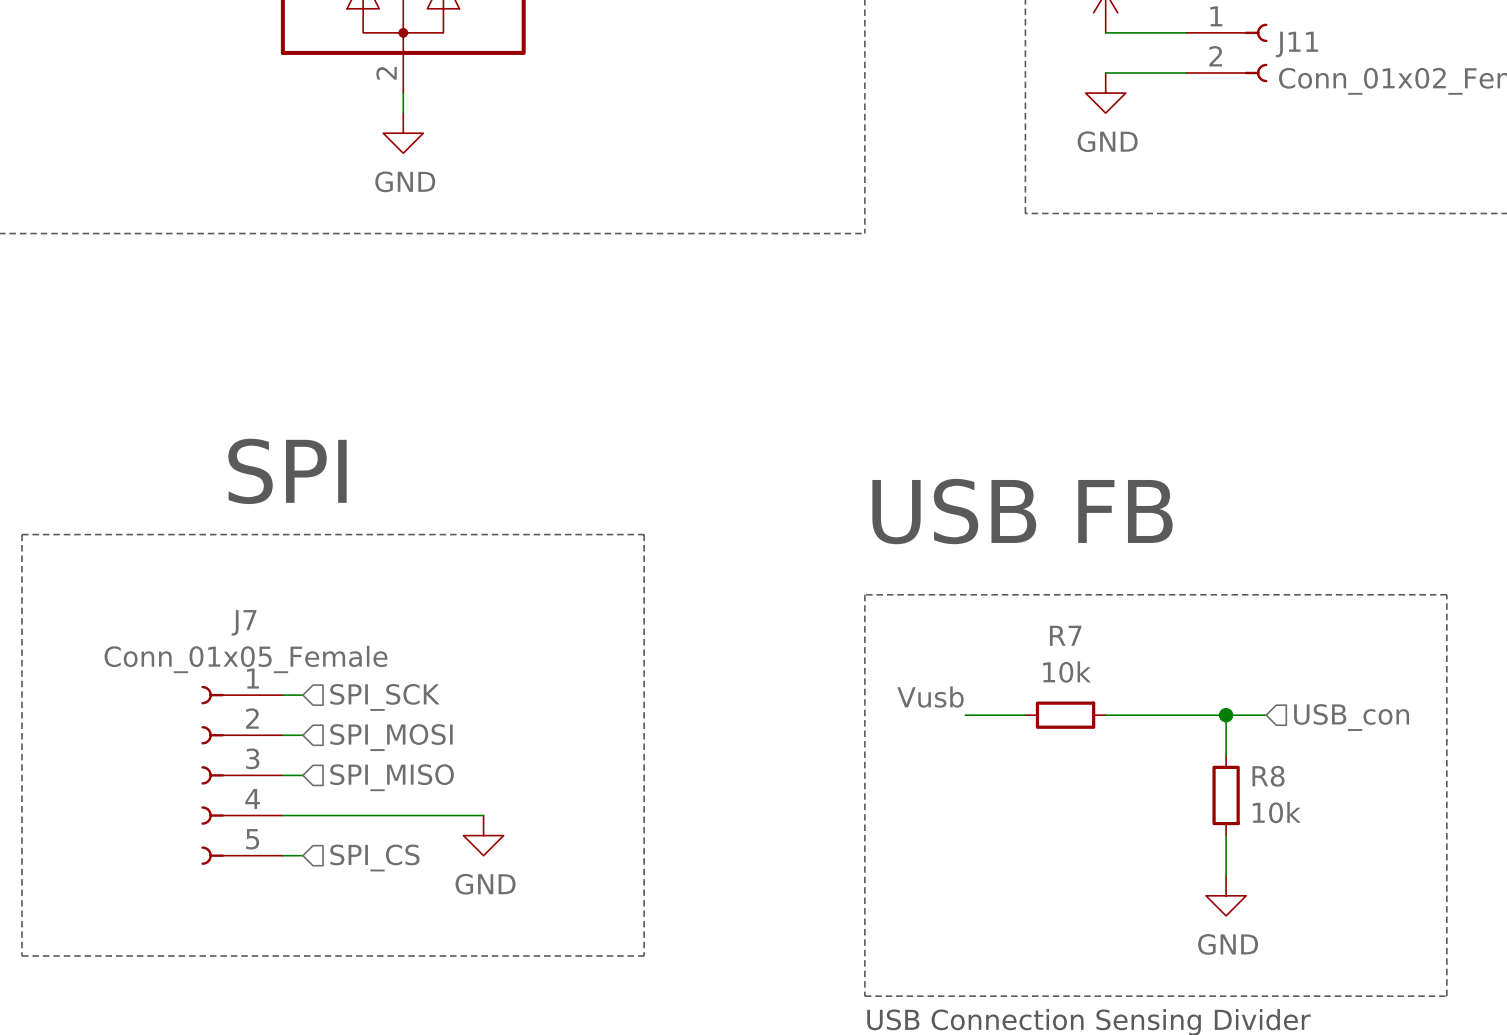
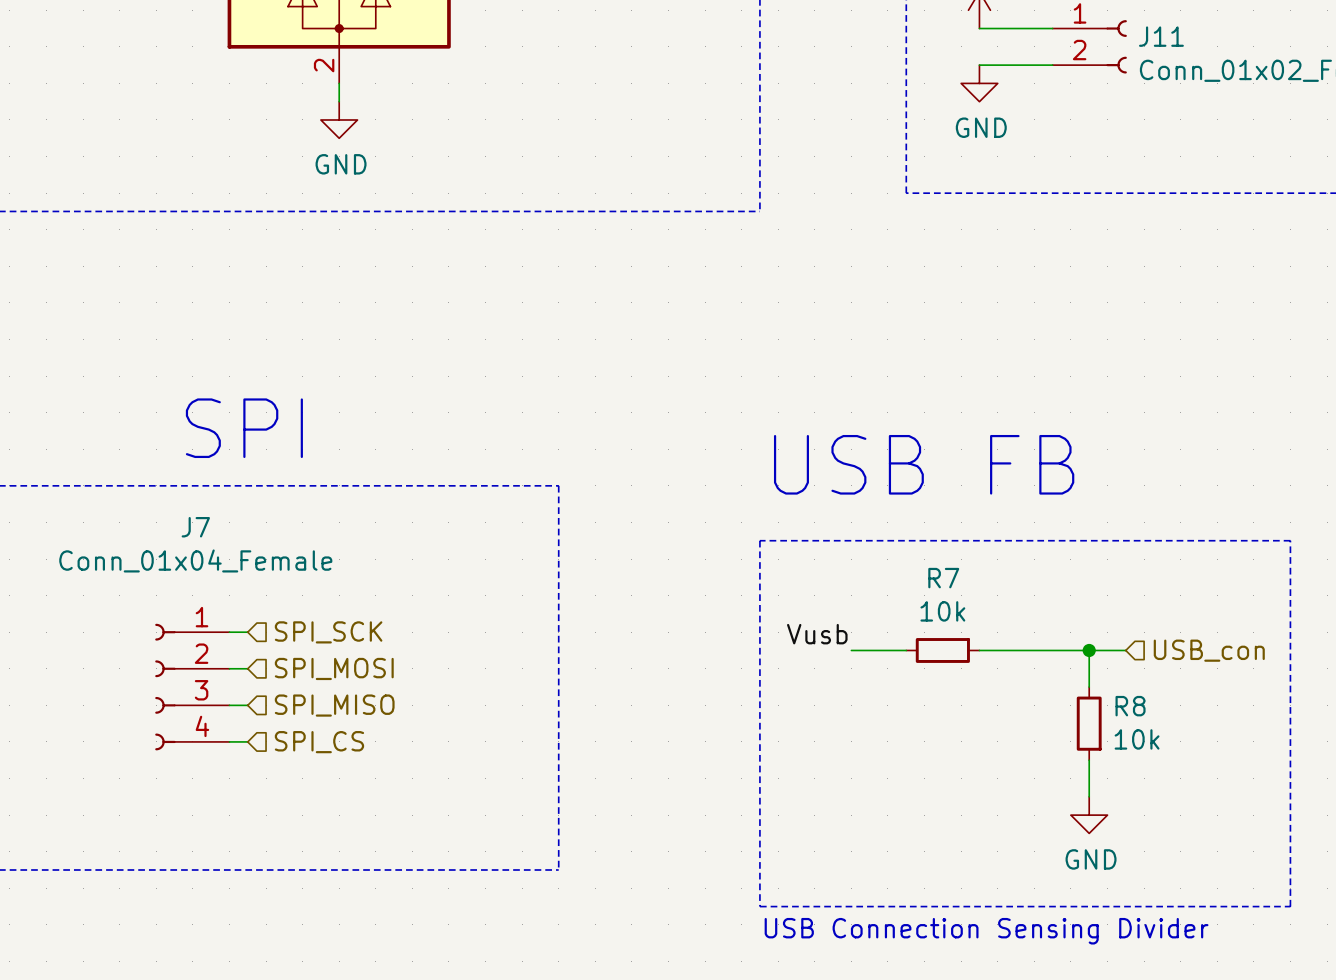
J7 value: Conn_01x05_Female (245, 659) -> Conn_01x04_Female (195, 560)
J7 symbol: [201, 685, 283, 865] -> [155, 623, 230, 751]
wire: (302, 815) (483, 815) -> none
power symbol: GND (483, 835) -> none
wire: (282, 855) (302, 855) -> none
hierarchical label position: SPI_CS (374, 857) -> SPI_CS (319, 742)

